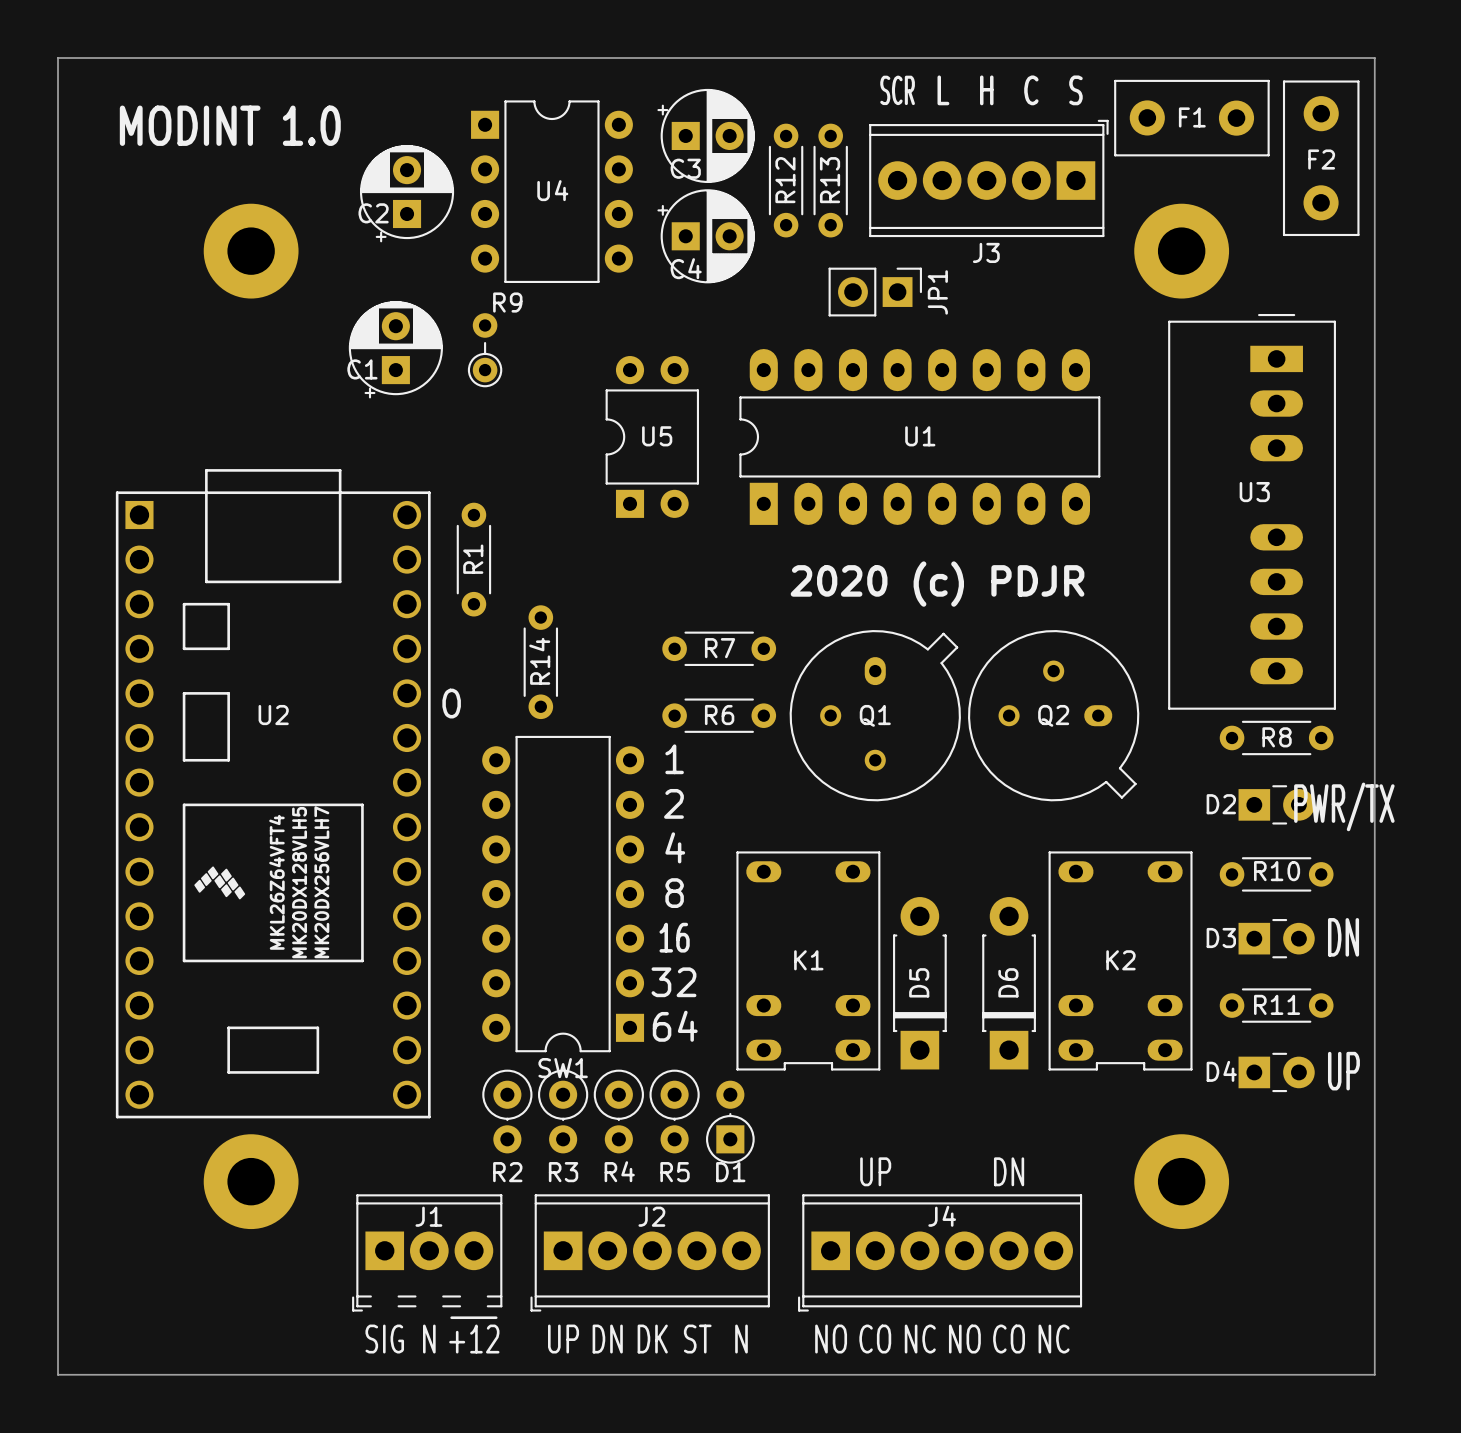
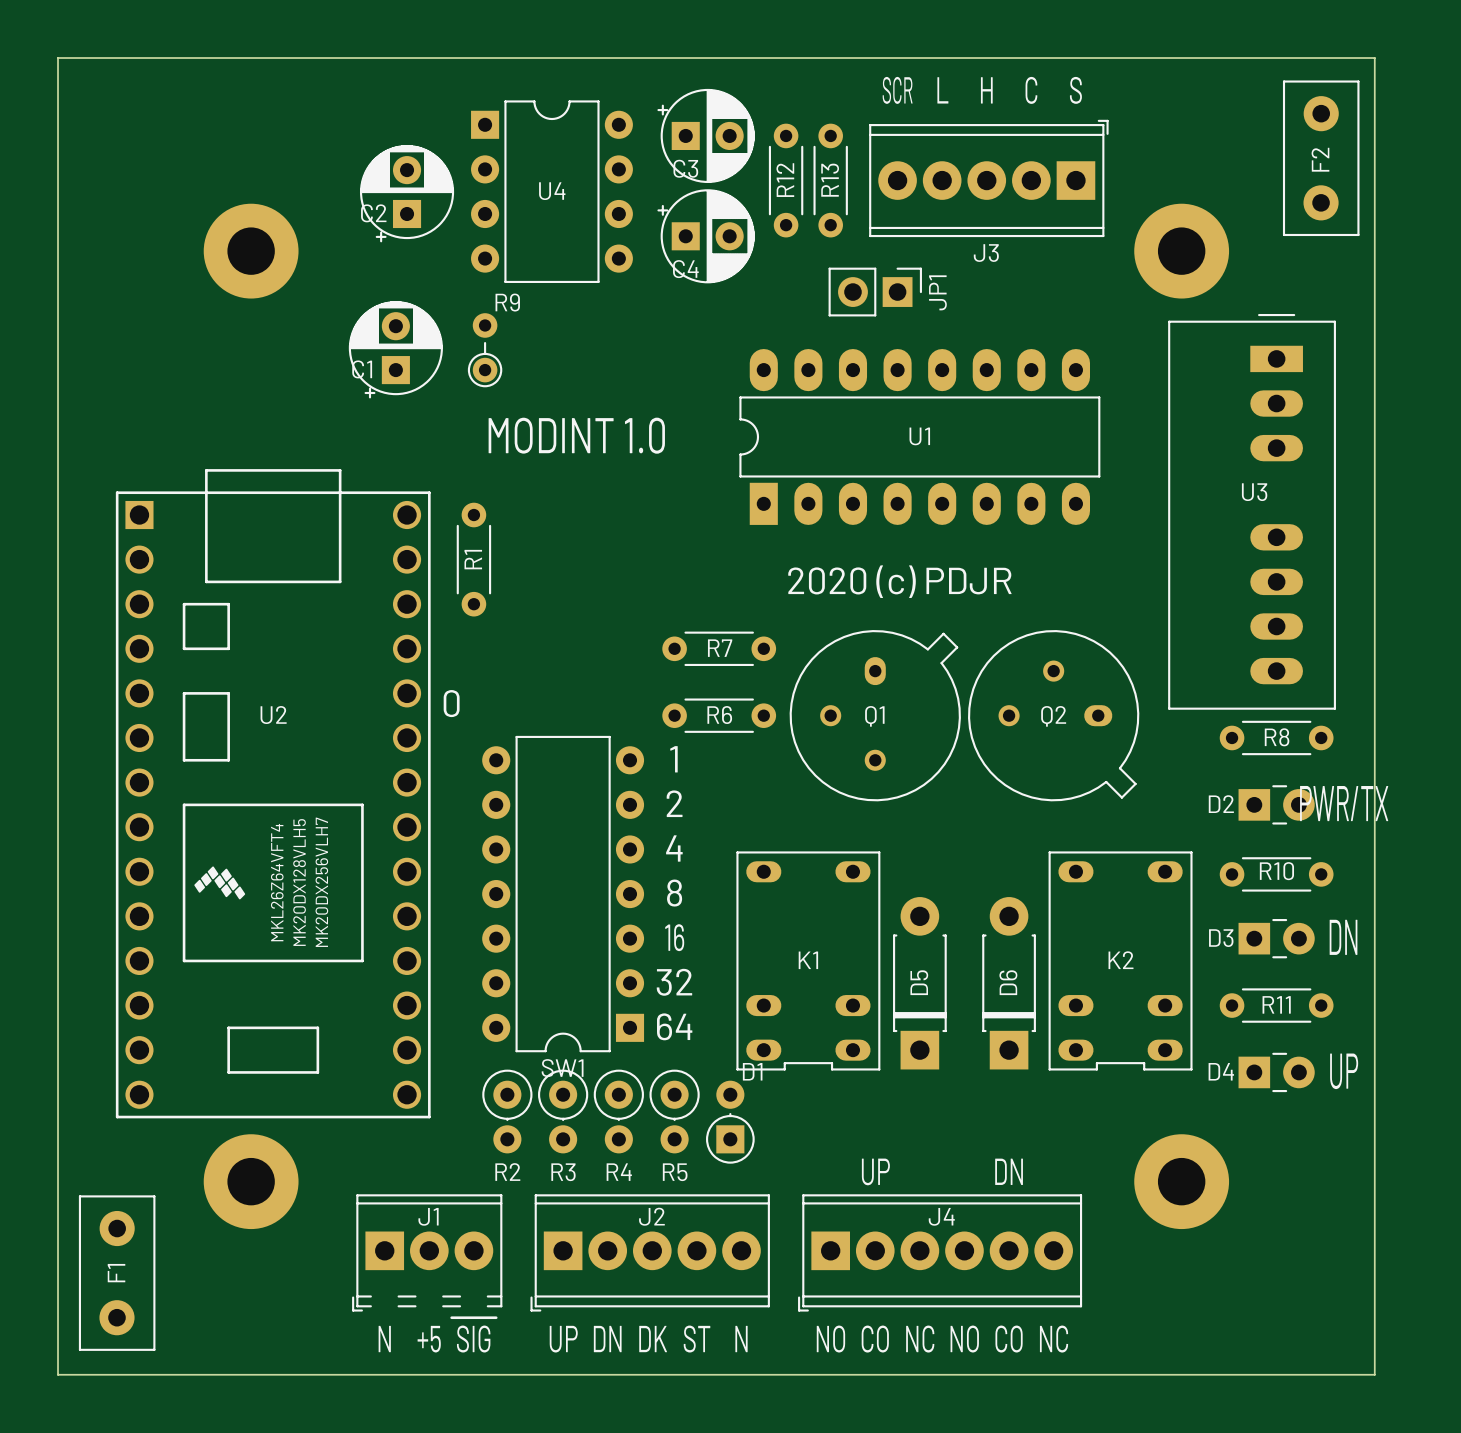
F1 rotation: 0° (1191, 118) -> 90° clockwise (117, 1273)
F1 position: (1191, 118) -> (117, 1273)
text: MODINT 1.0 (230, 125) -> none
F2 name rotation: 0° (1321, 159) -> 90° counterclockwise (1320, 159)
text: none -> MODINT 1.0 (576, 435)
U5: (652, 436) -> none
R14: (540, 662) -> none
D1 name position: D1 (730, 1172) -> D1 (752, 1071)
text: SIG (384, 1339) -> N (384, 1339)
text: N (429, 1339) -> +5 (429, 1339)
text: +12 (474, 1339) -> SIG (473, 1339)

